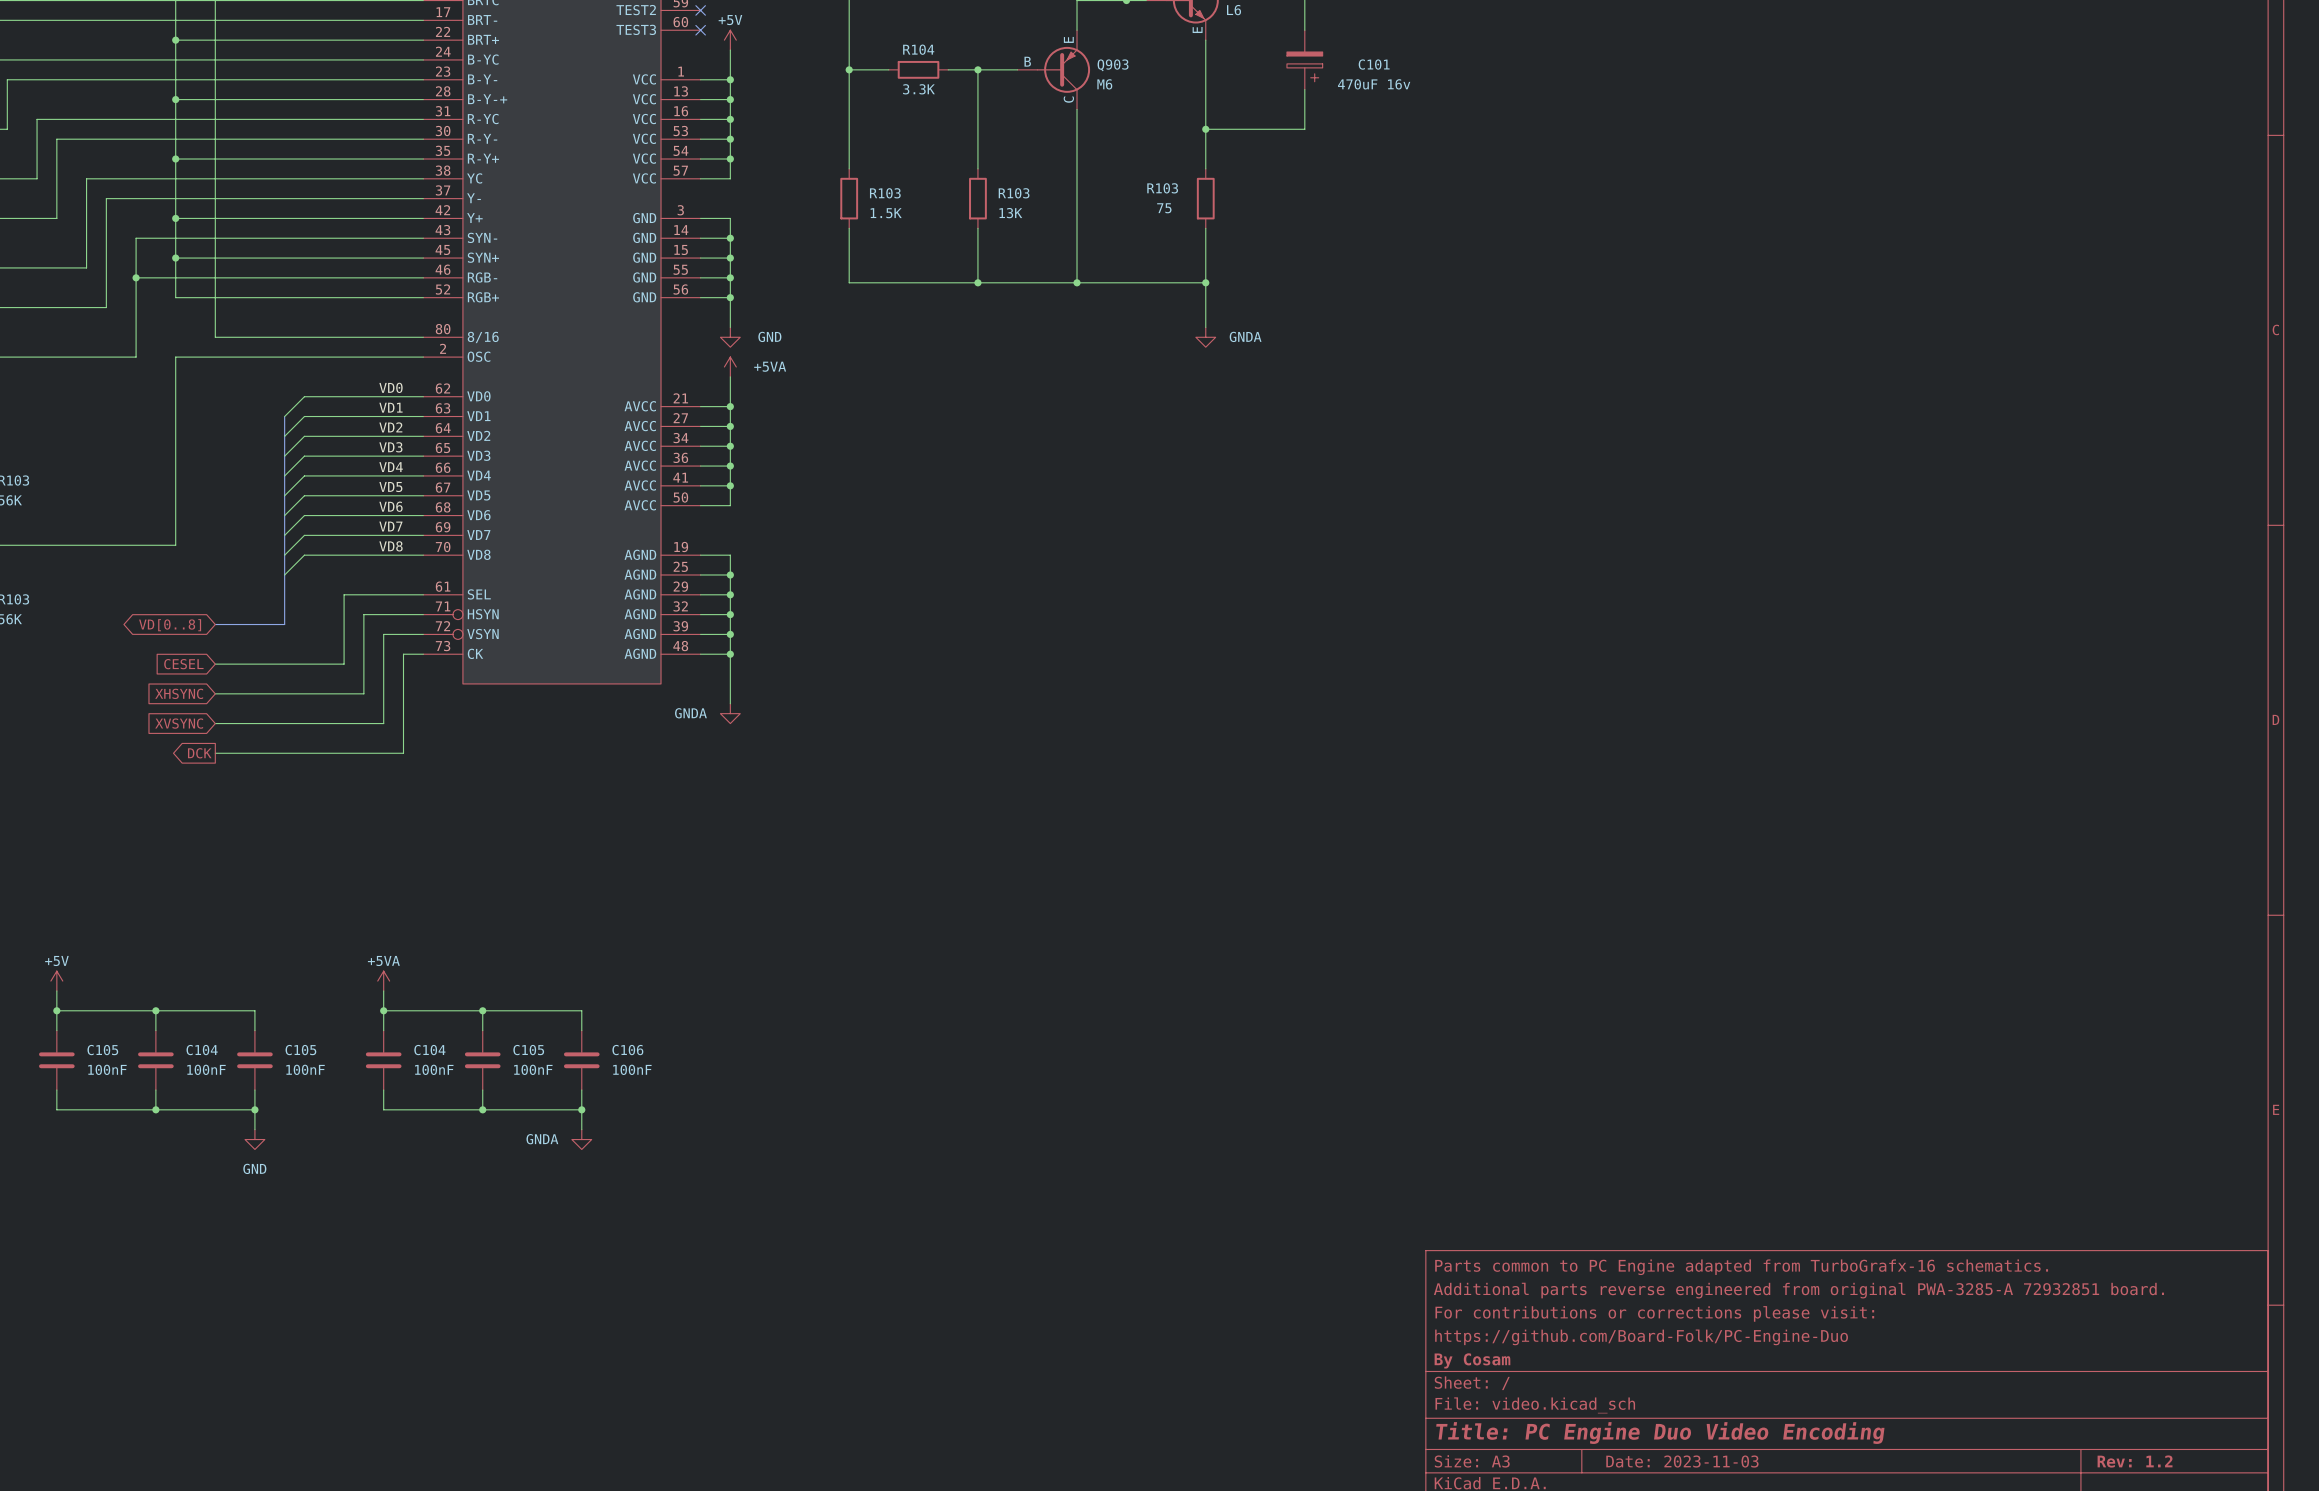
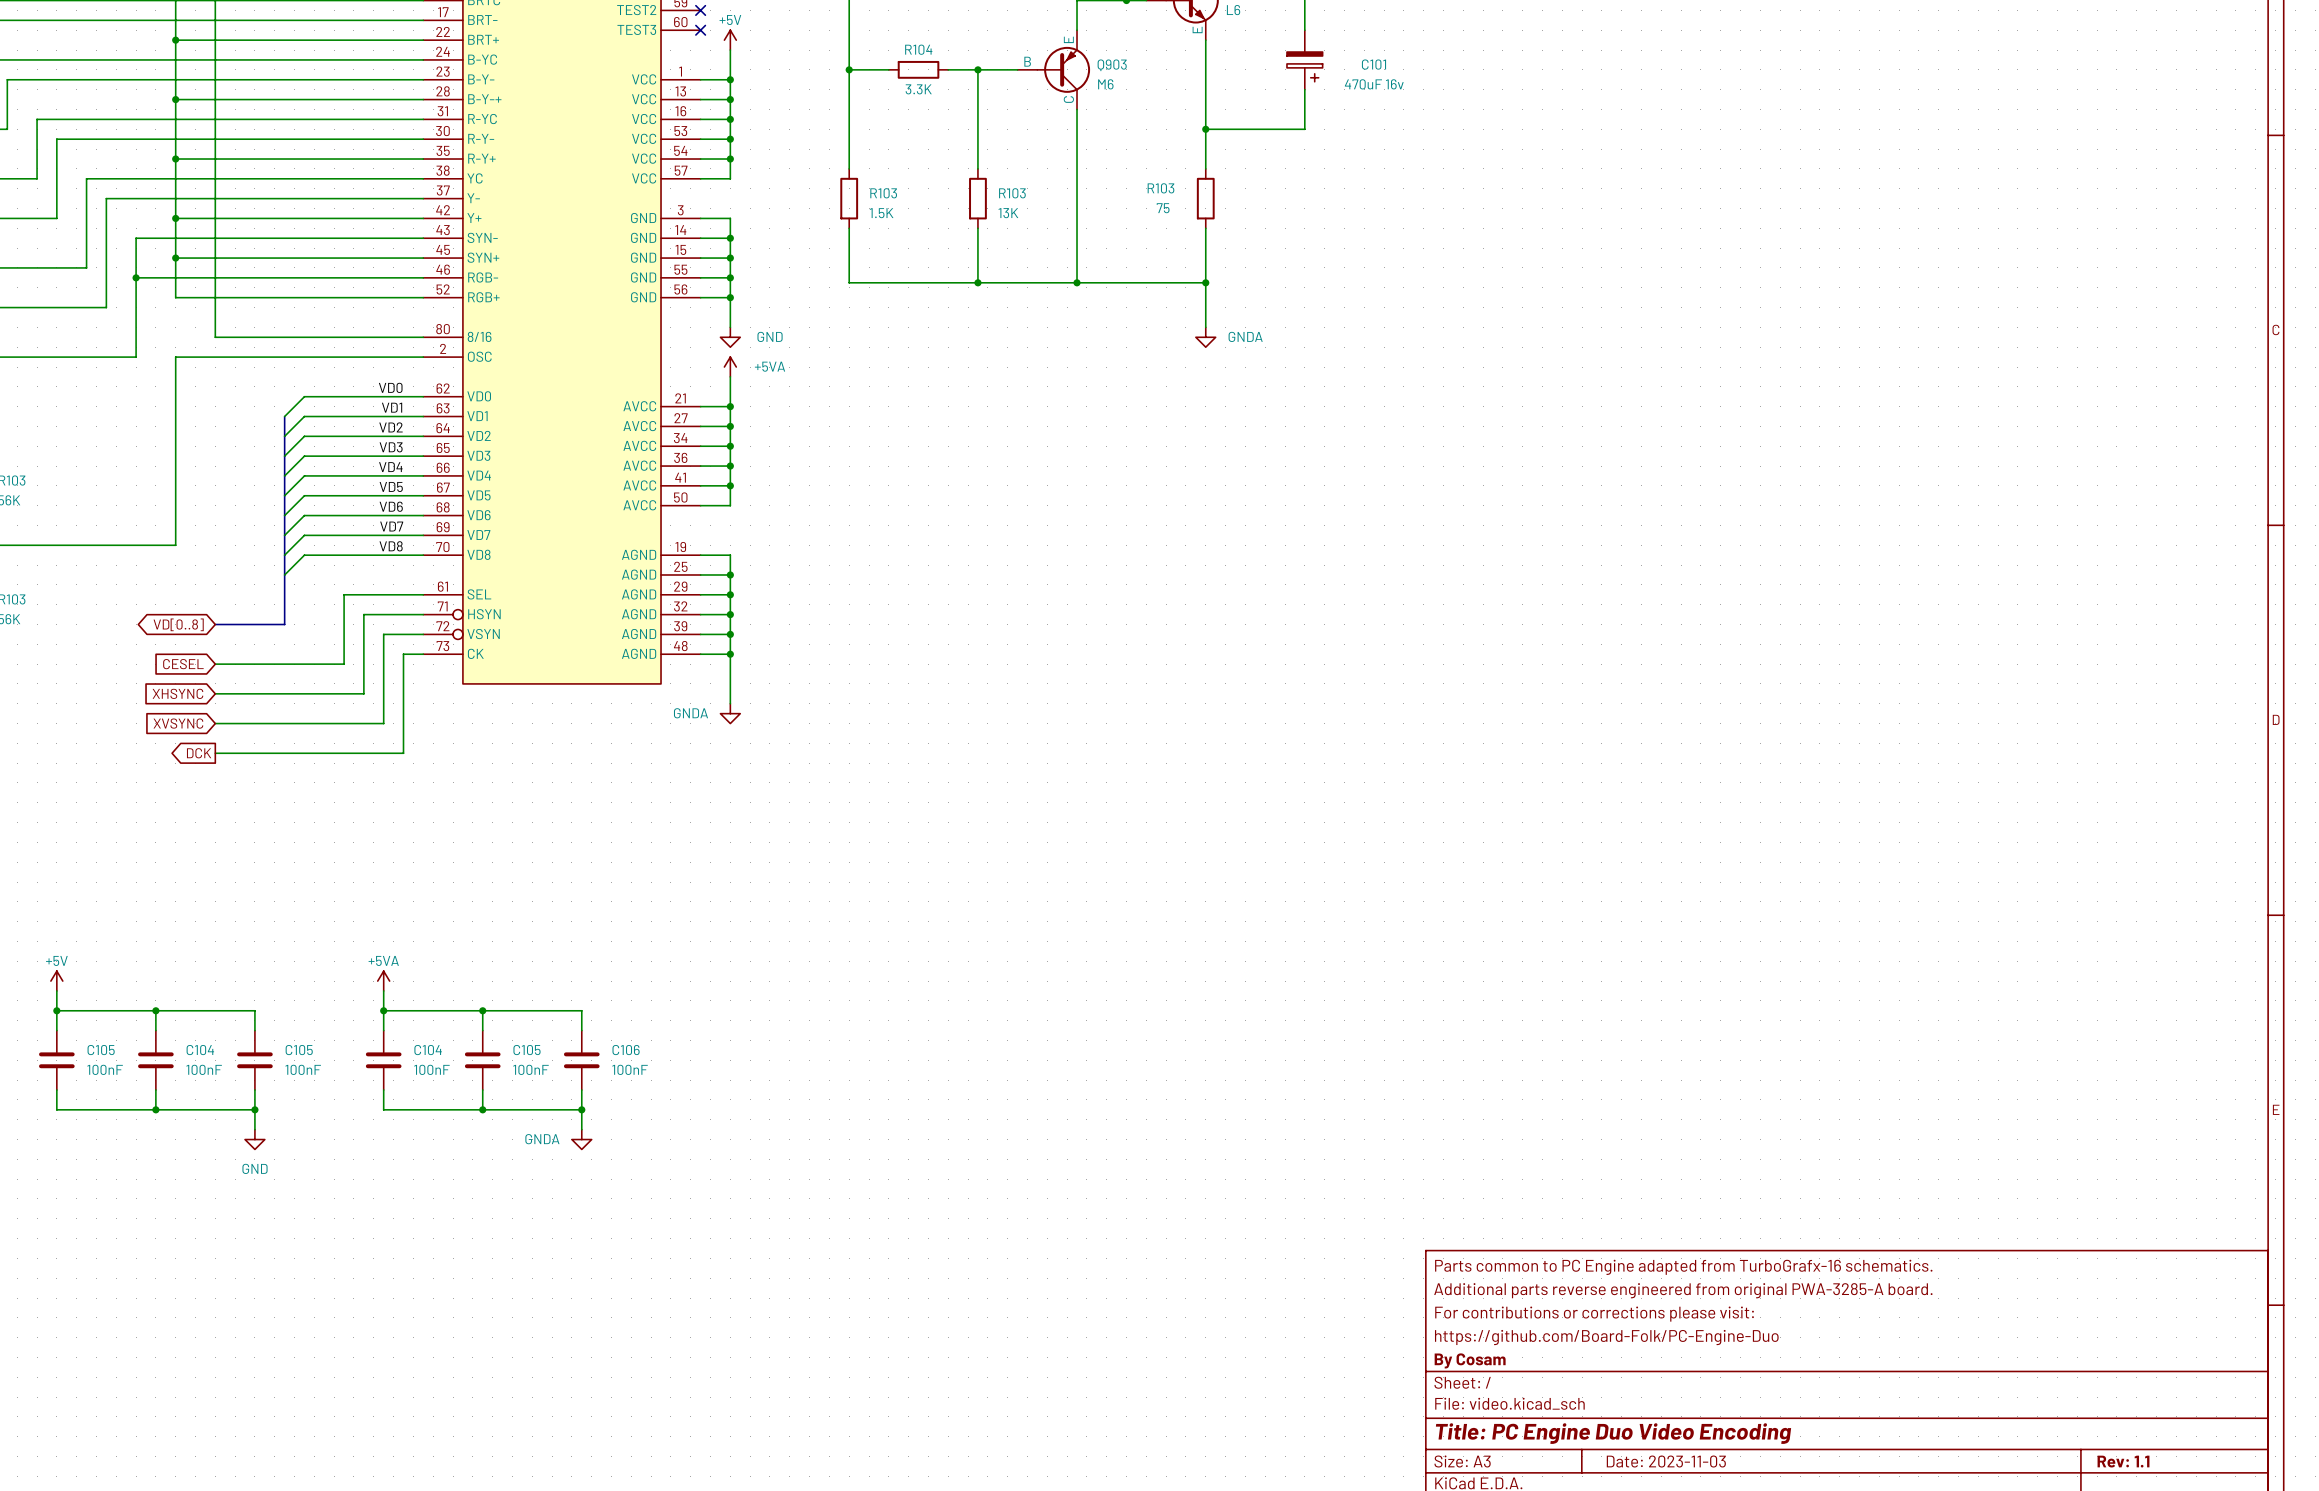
title block: Additional parts reverse engineered from original PWA-3285-A 72932851 board. (1798, 1290) -> Additional parts reverse engineered from original PWA-3285-A board. (1683, 1290)
title block: Rev: 1.2 (2135, 1461) -> Rev: 1.1 (2123, 1461)

